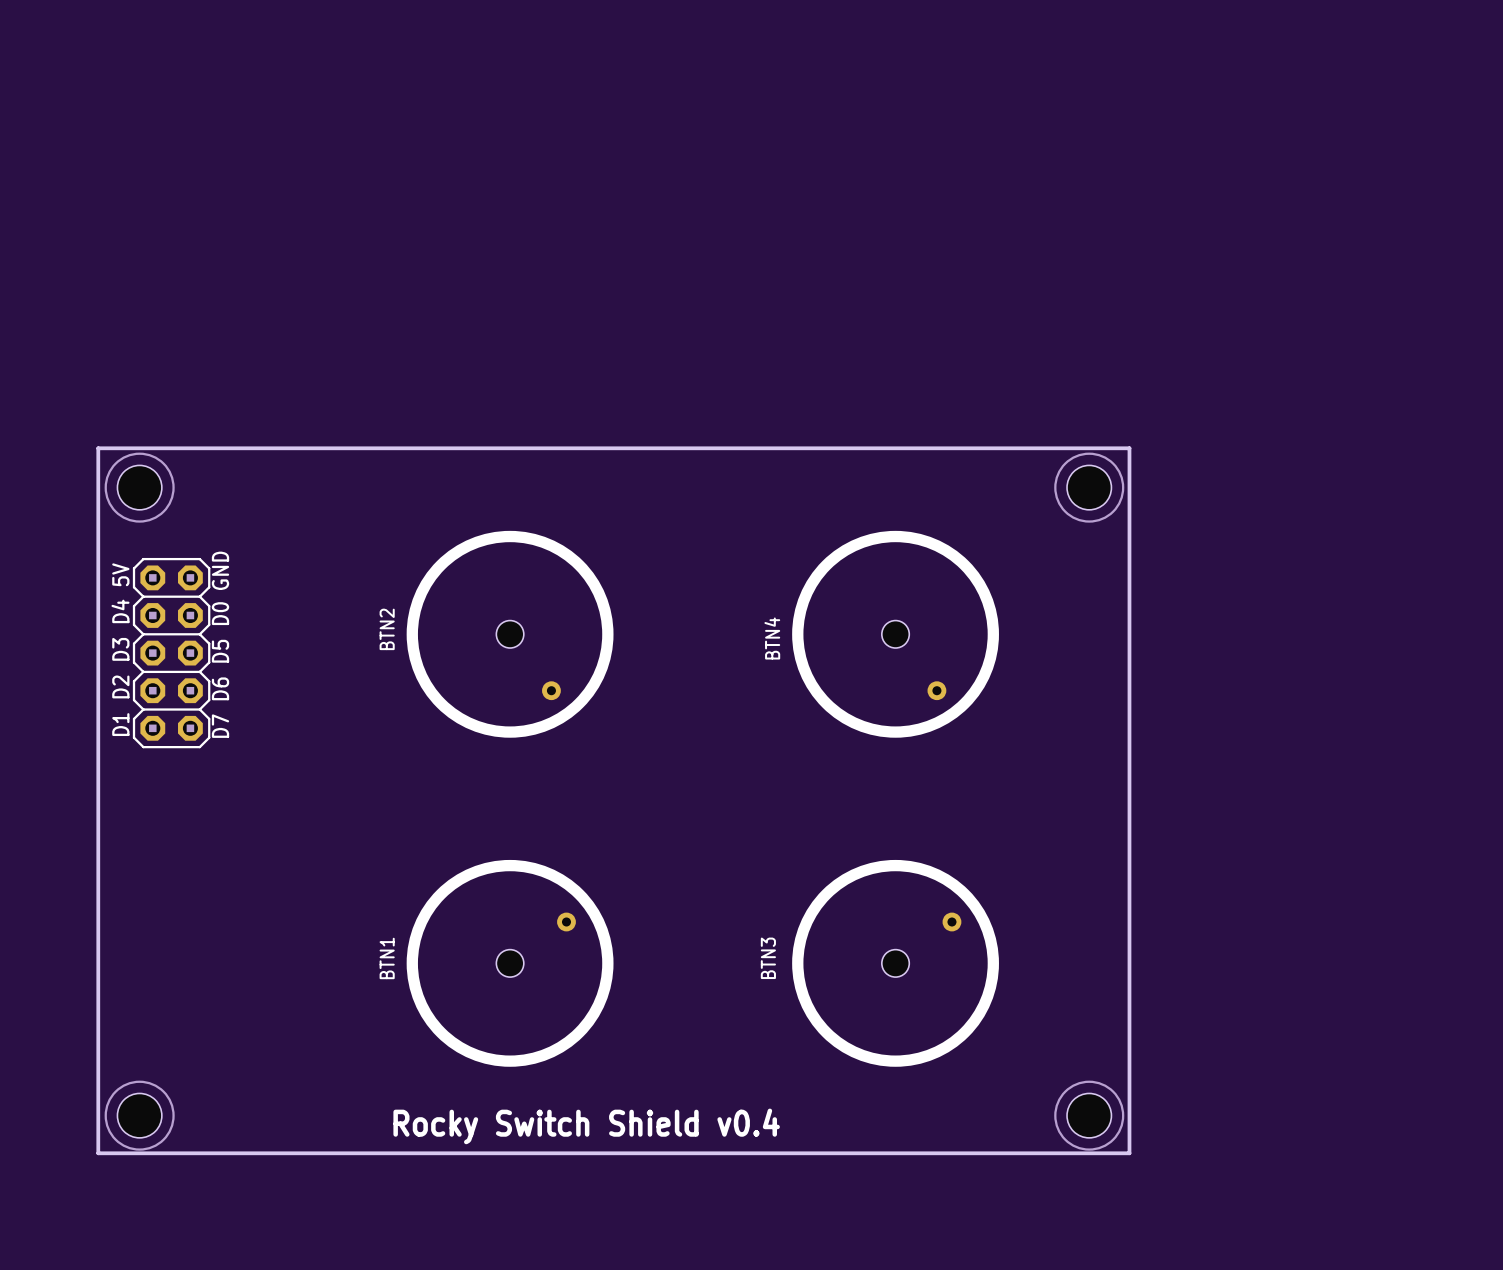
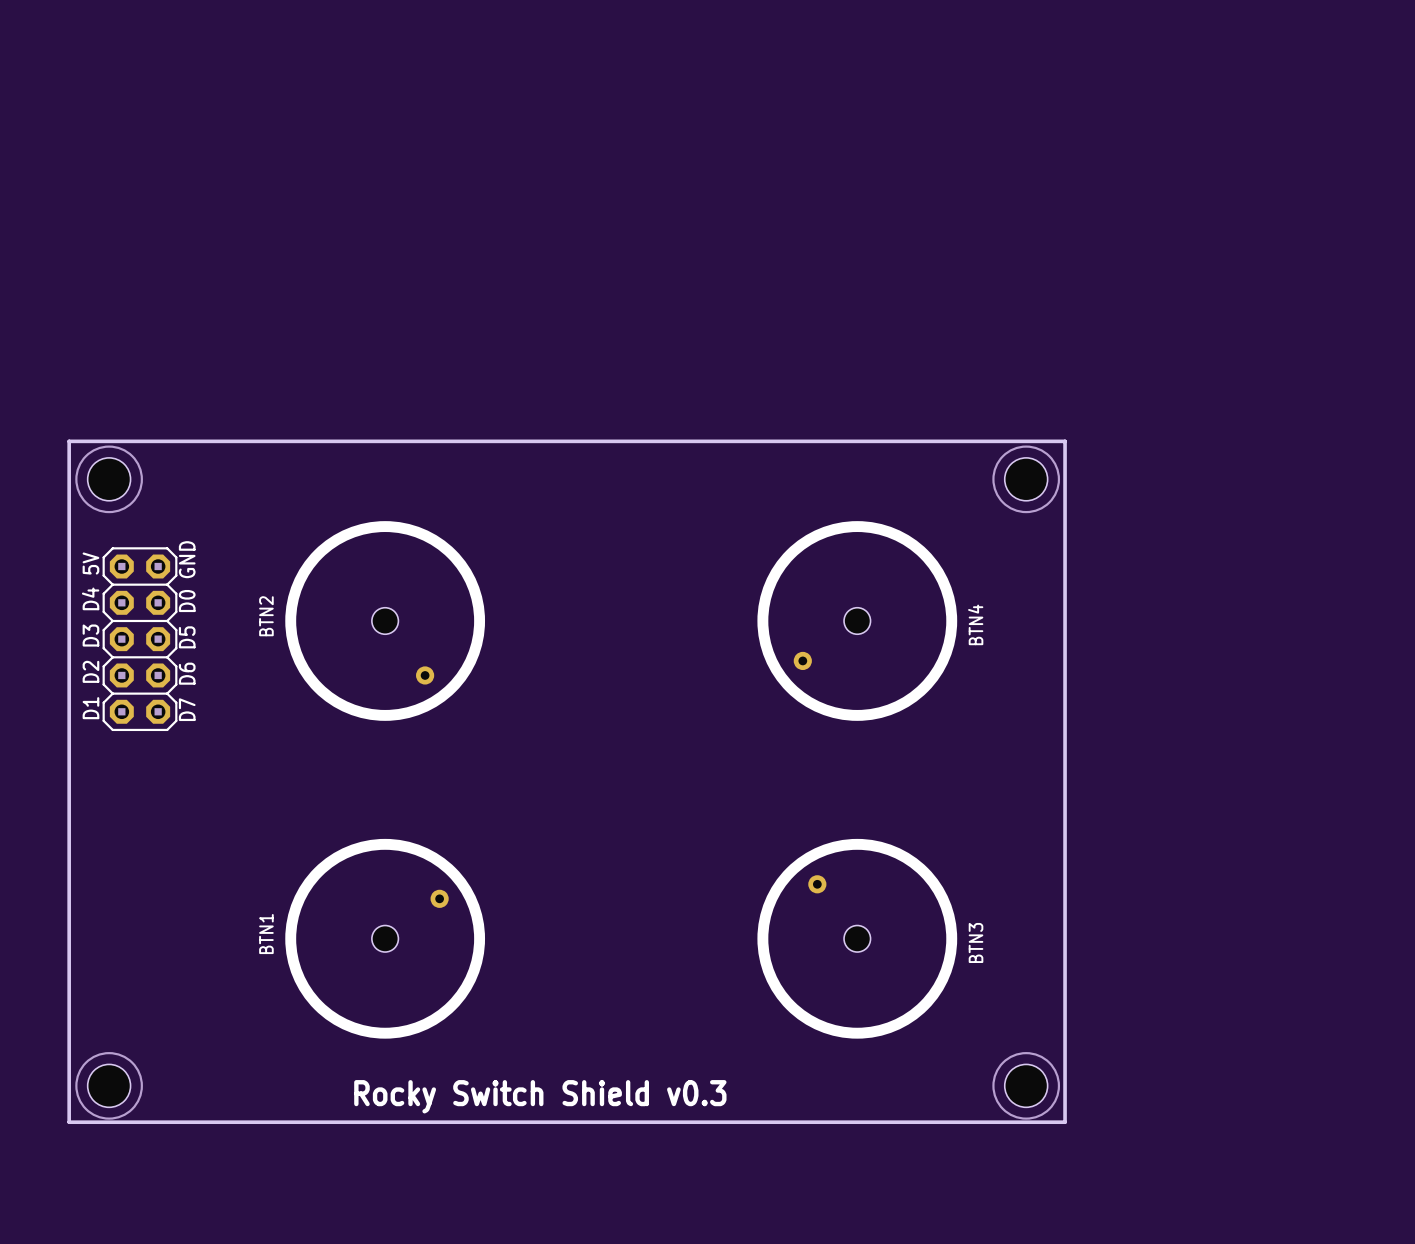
BTN2 position: (510, 634) -> (385, 620)
BTN4 rotation: 0° (895, 634) -> 90° clockwise (857, 620)
BTN4 name position: BTN4 (772, 638) -> BTN4 (975, 624)
BTN3 name position: BTN3 (768, 958) -> BTN3 (976, 942)
BTN1 position: (510, 963) -> (385, 938)
BTN3 rotation: 0° (895, 963) -> 90° counterclockwise (857, 938)
text: Rocky Switch Shield v0.4 (586, 1126) -> Rocky Switch Shield v0.3 (540, 1096)

